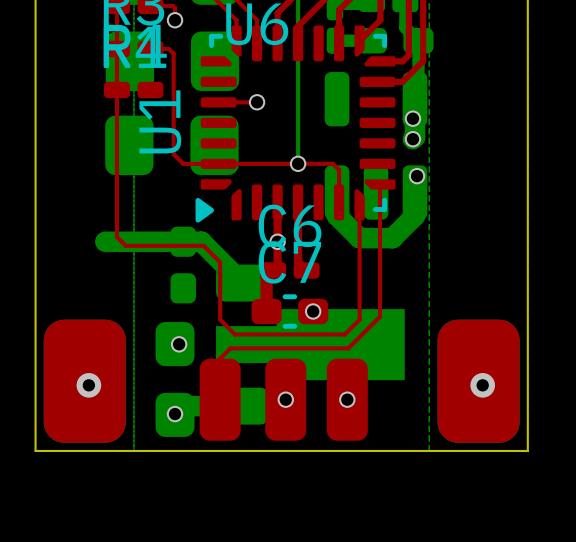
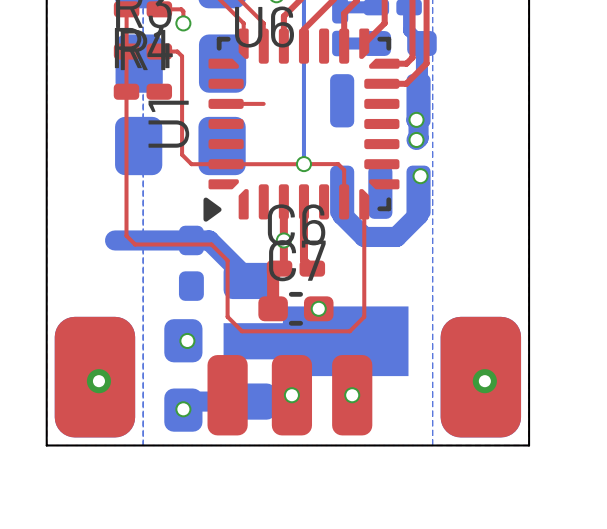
via: (257, 102) -> none
top track: (380, 184) (380, 316) (348, 348) (230, 348) (220, 358) (220, 399) -> none

